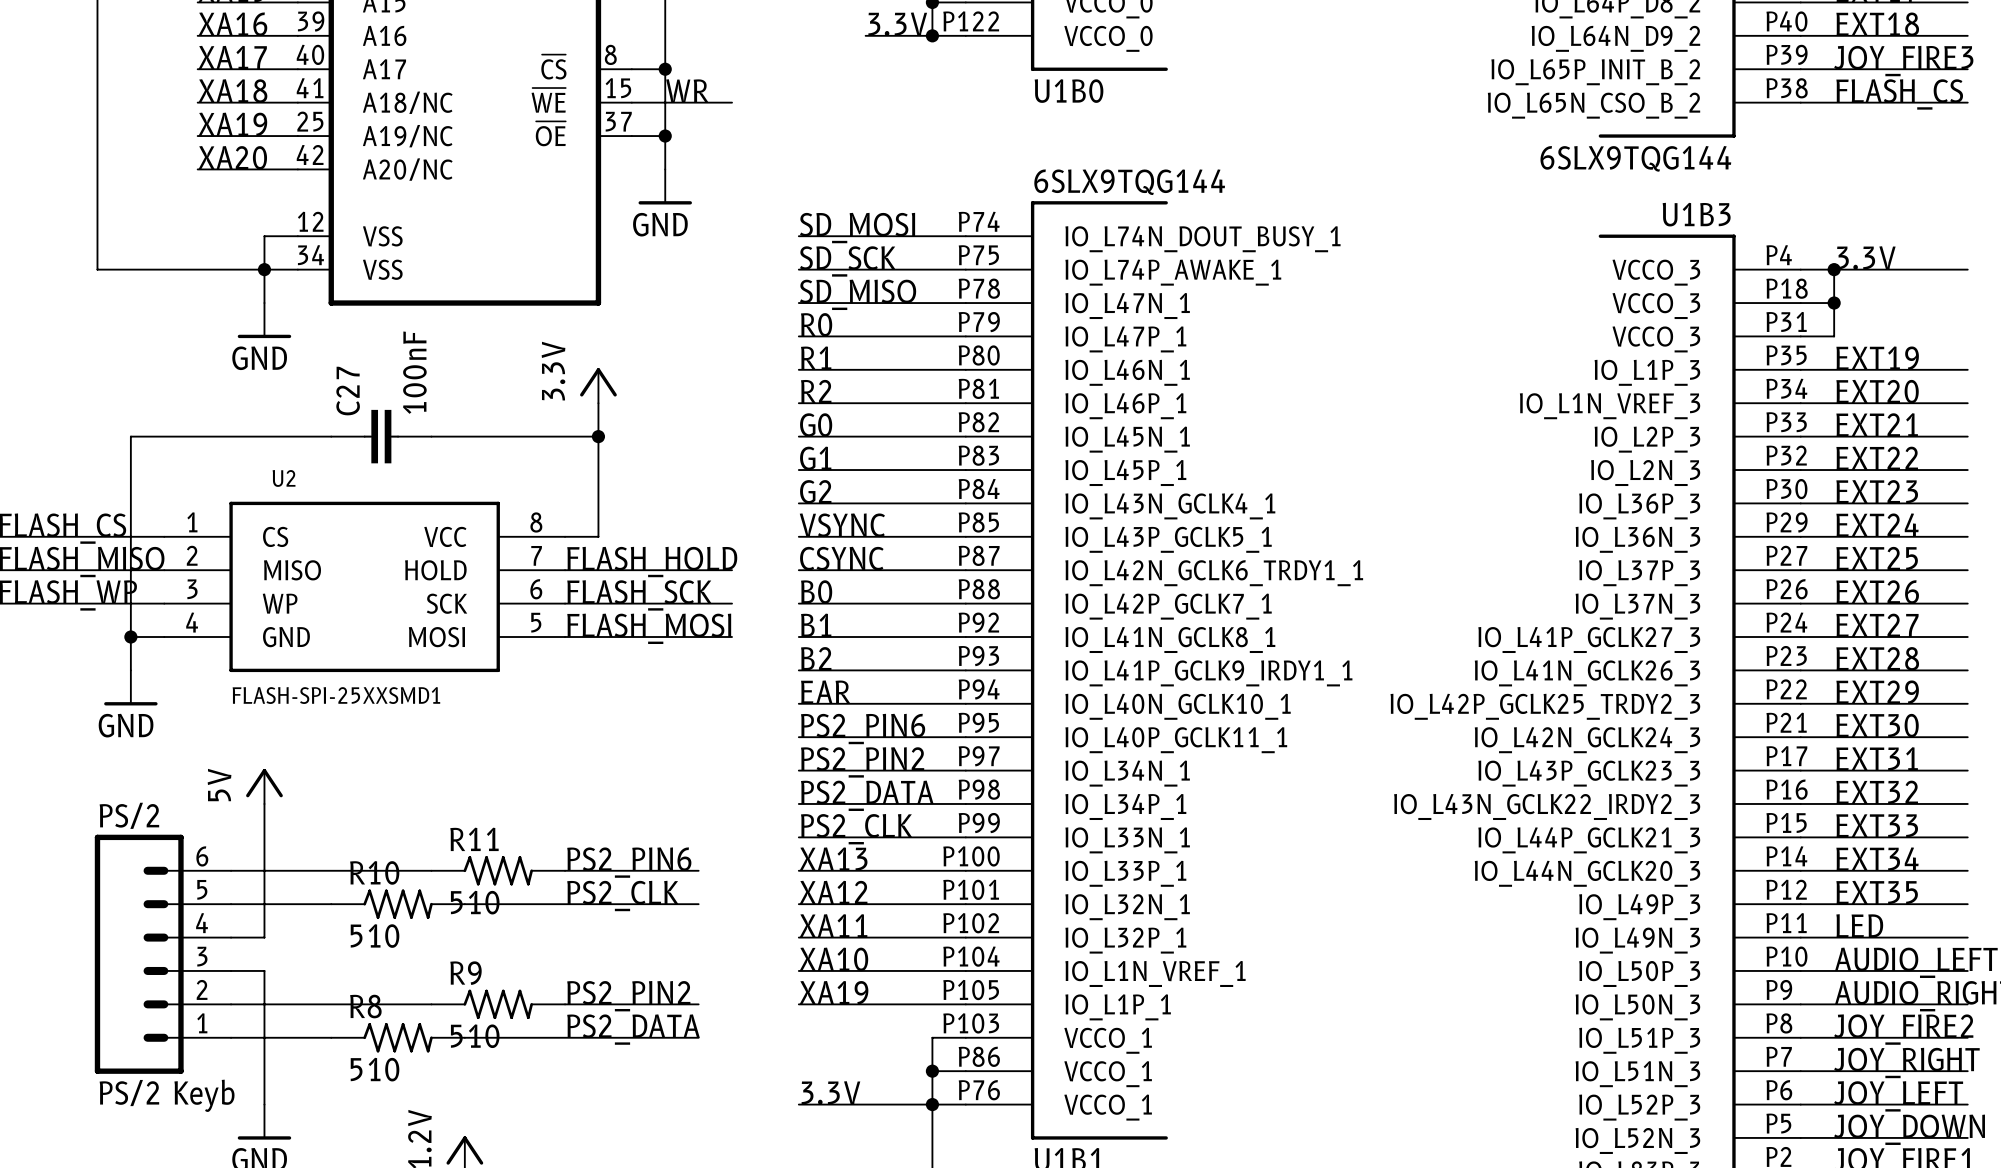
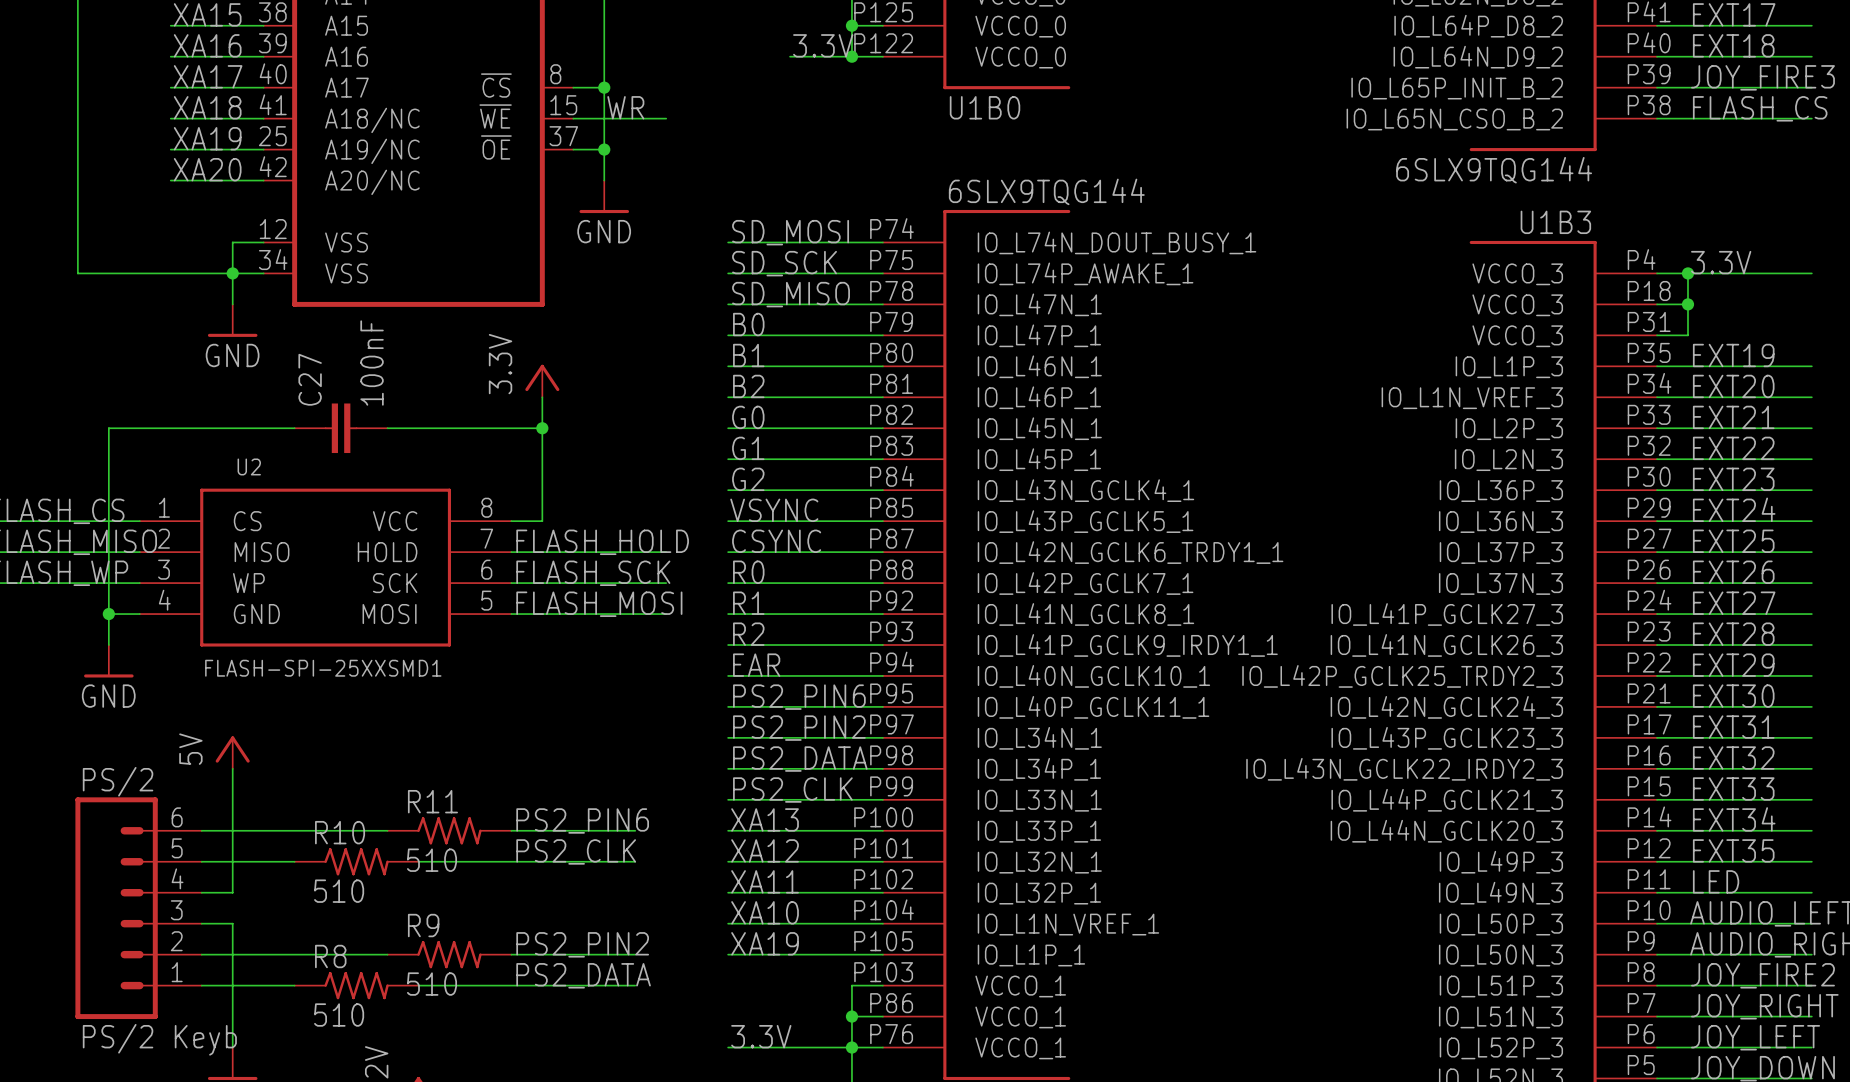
label: R0 (816, 324) -> B0 (748, 324)
label: R1 (816, 358) -> B1 (748, 355)
label: R2 (816, 391) -> B2 (748, 386)
label: B0 (816, 592) -> R0 (748, 572)
label: B1 (816, 625) -> R1 (748, 603)
label: B2 (816, 658) -> R2 (748, 634)

